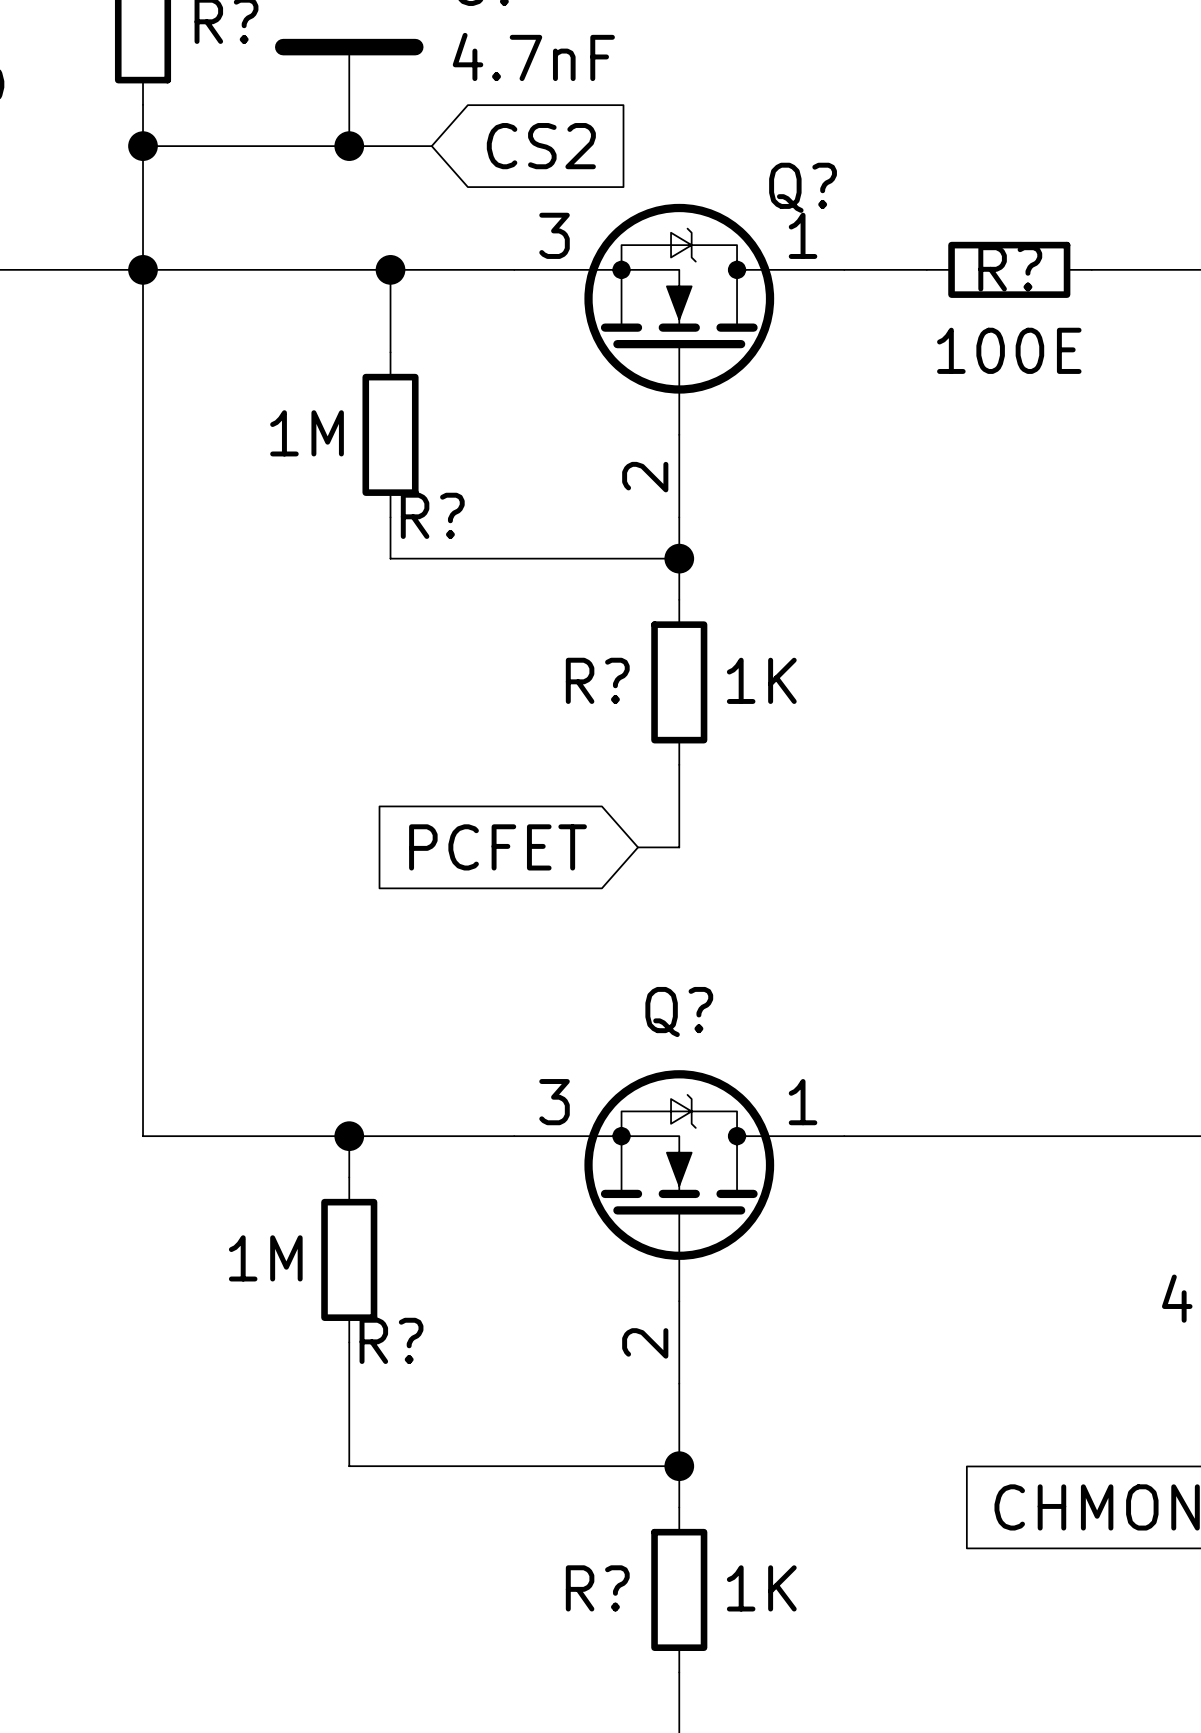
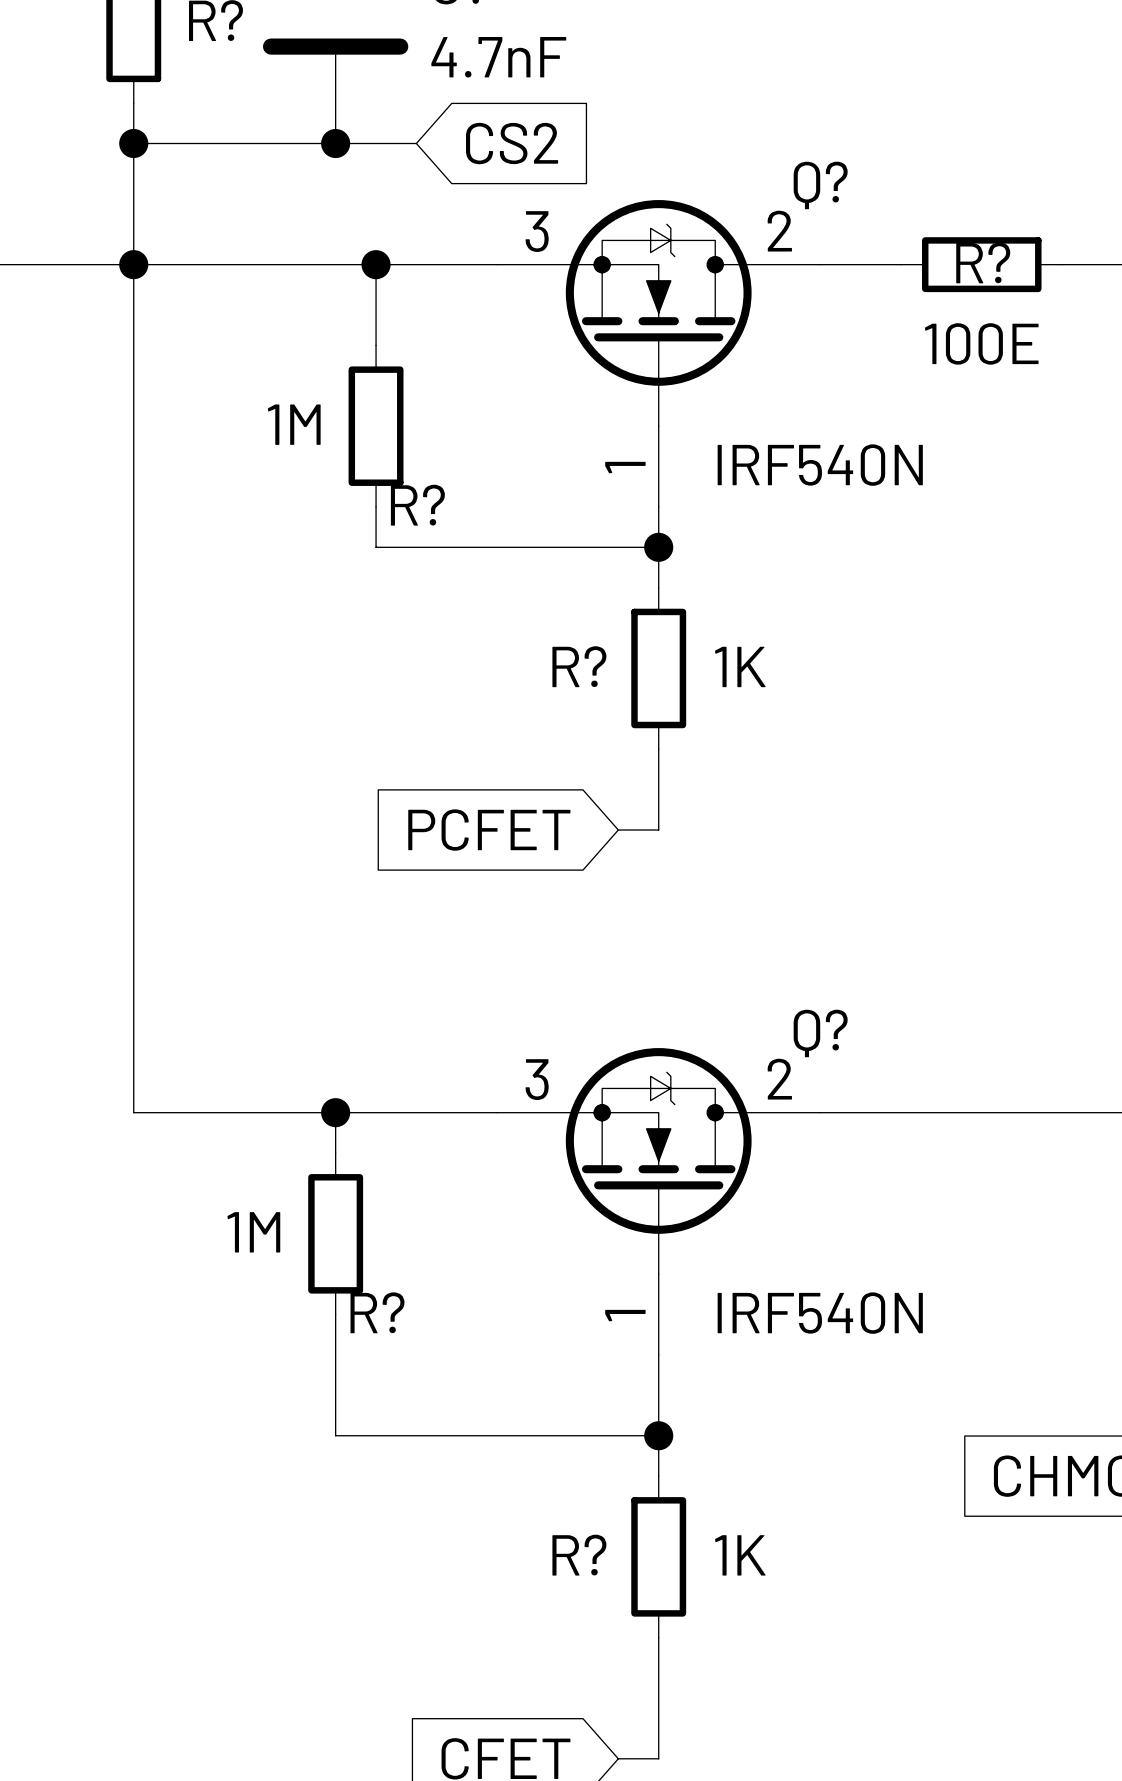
Q? name position: Q? (803, 187) -> Q? (820, 185)
Q? pin number: 1 (803, 235) -> 2 (779, 231)
Q? value: none -> IRF540N (820, 465)
Q? pin number: 2 (645, 477) -> 1 (625, 467)
Q? name position: Q? (679, 1012) -> Q? (820, 1033)
Q? pin number: 1 (803, 1102) -> 2 (779, 1079)
Q? value: none -> IRF540N (820, 1313)
Q? pin number: 2 (645, 1343) -> 1 (625, 1315)

